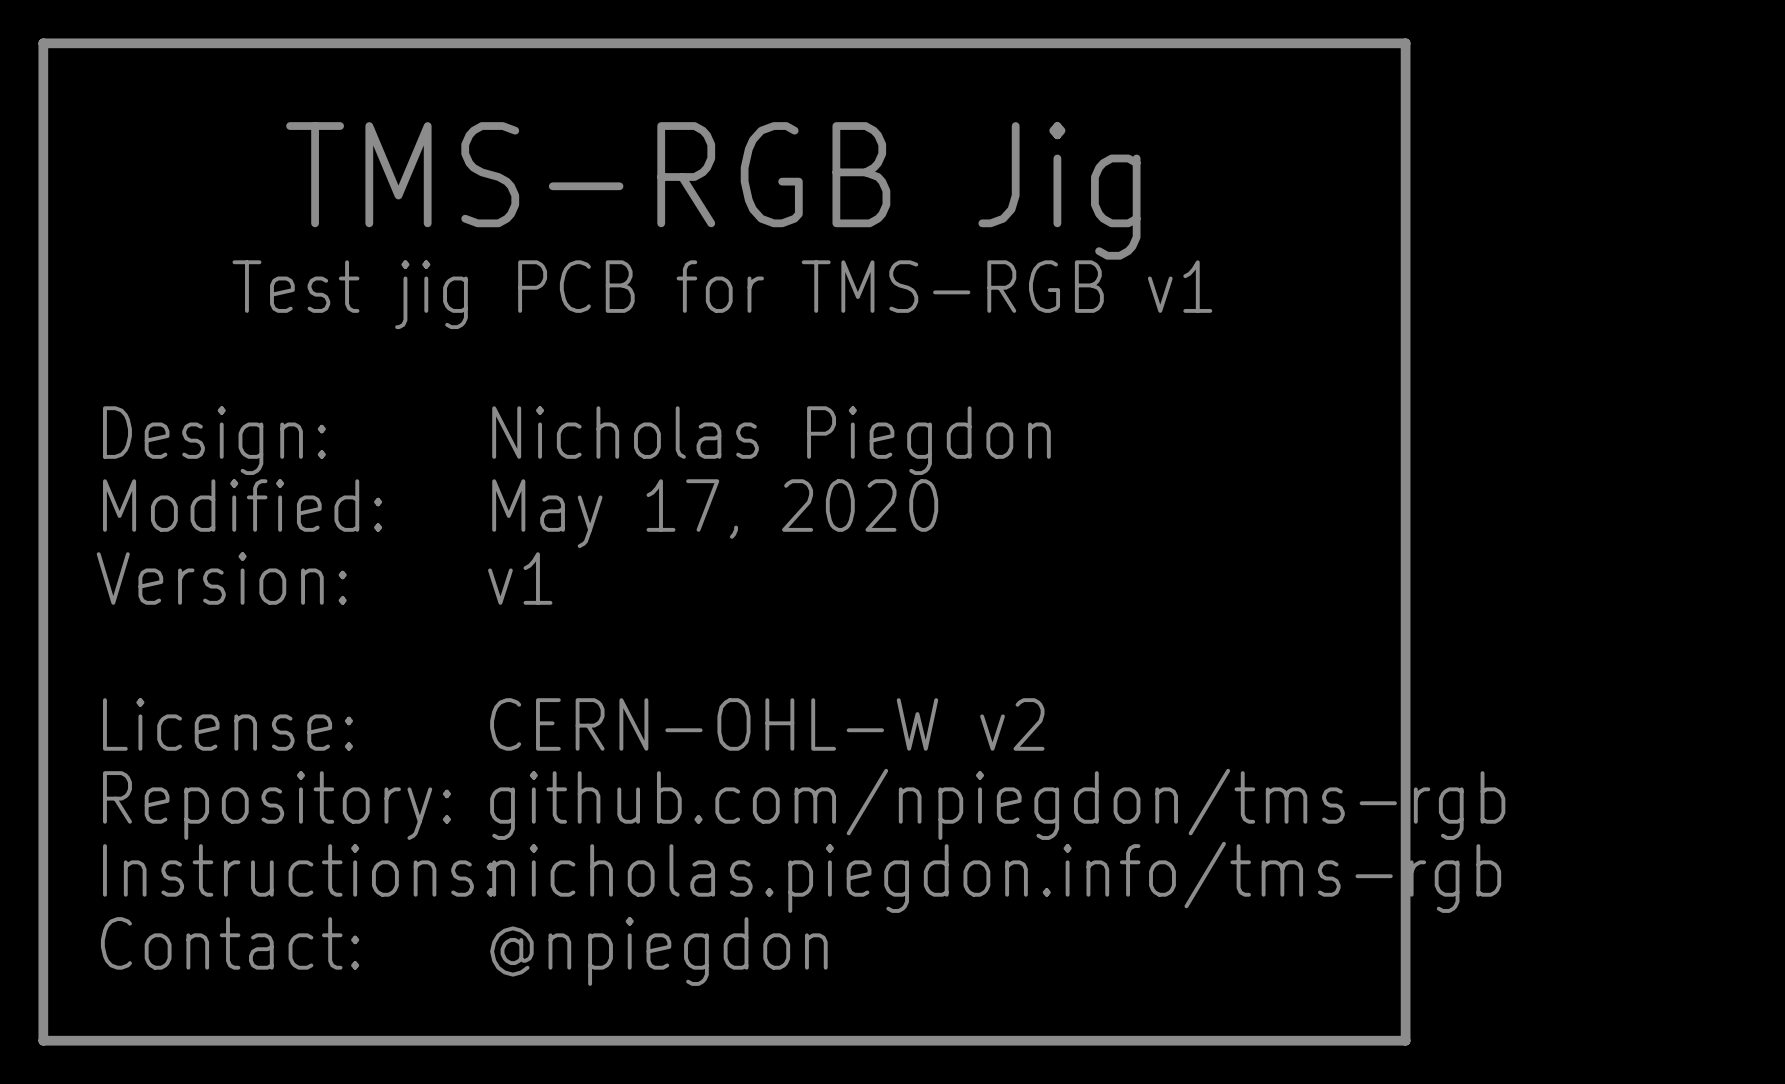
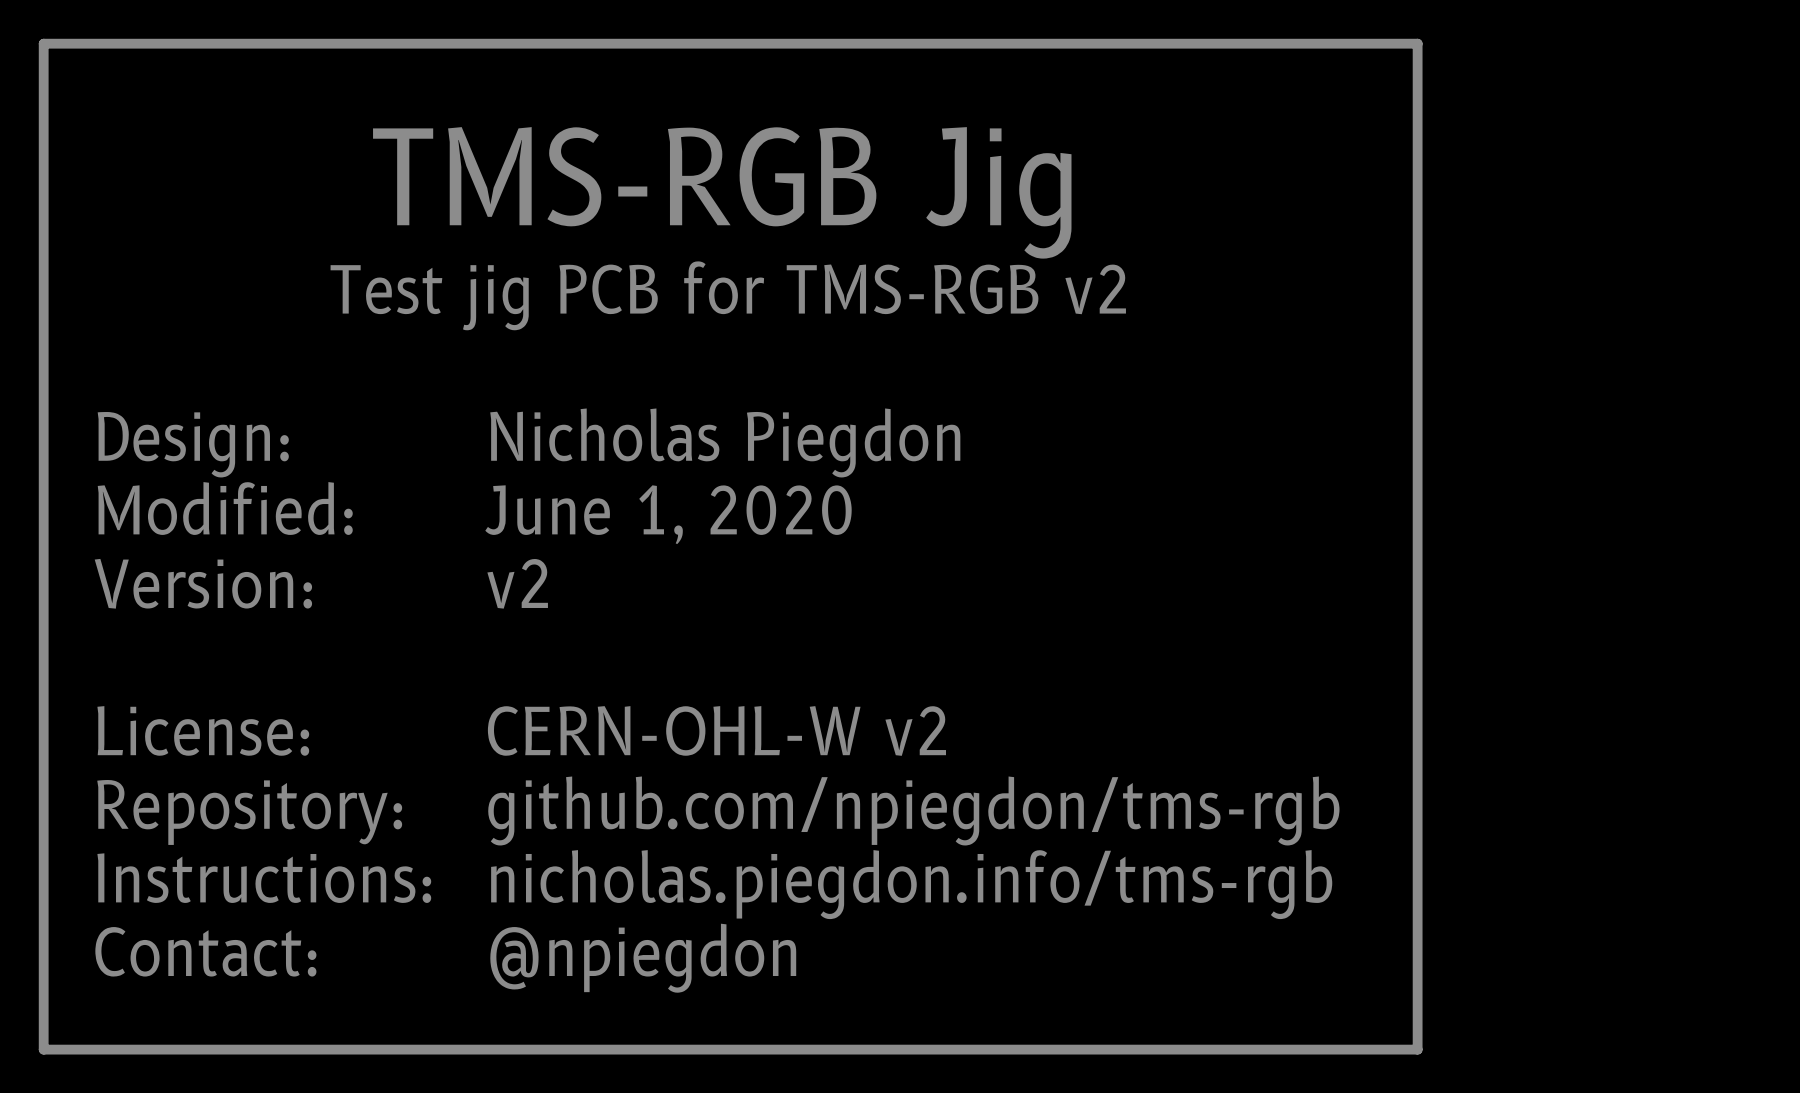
text: Test jig PCB for TMS-RGB v1 (722, 294) -> Test jig PCB for TMS-RGB v2 (728, 295)
text: May 17, 2020 (715, 513) -> June 1, 2020 (668, 514)
text: v1 (520, 578) -> v2 (517, 583)

